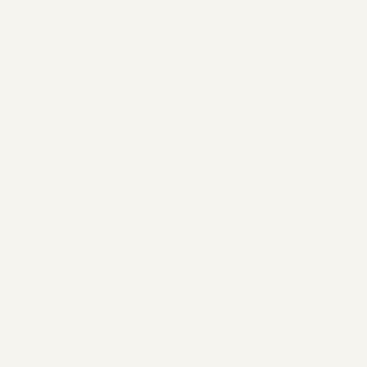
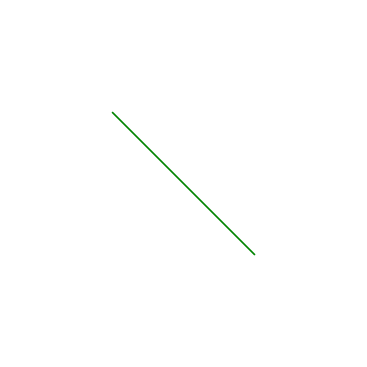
wire: none -> (112, 112) (254, 254)

